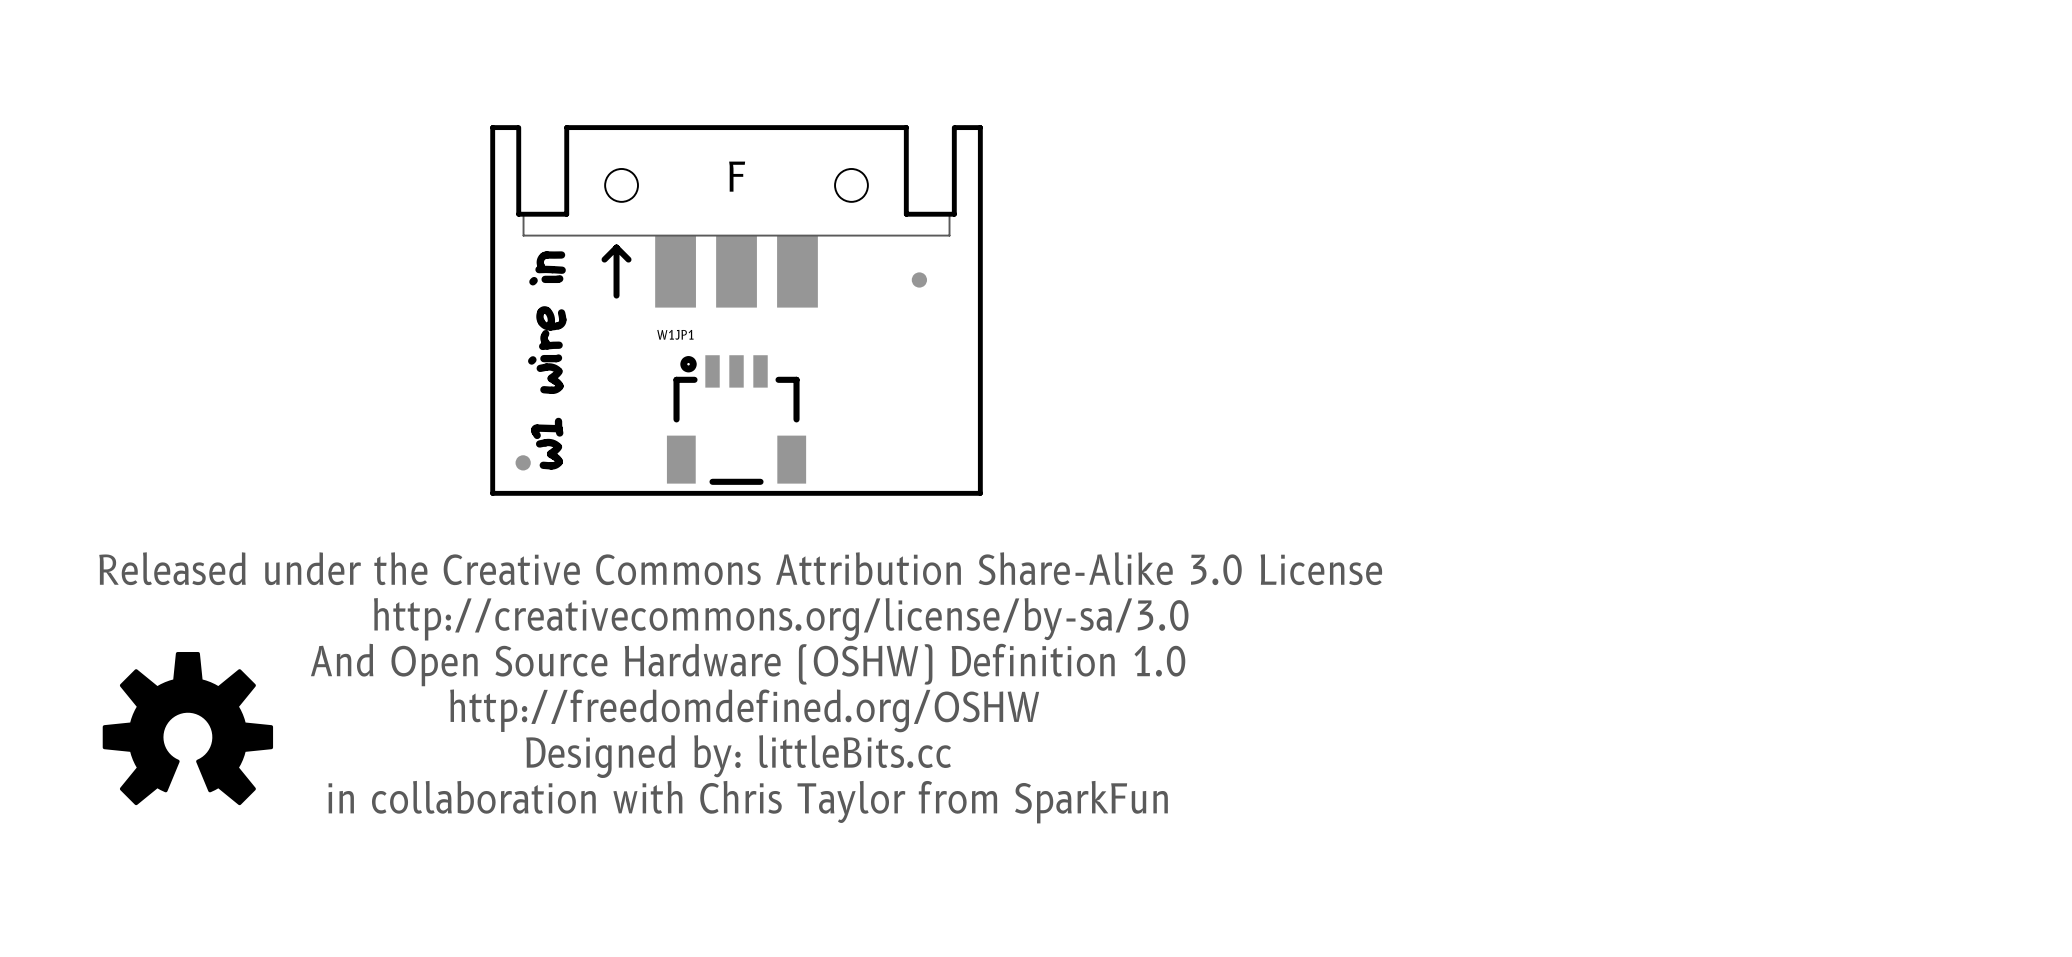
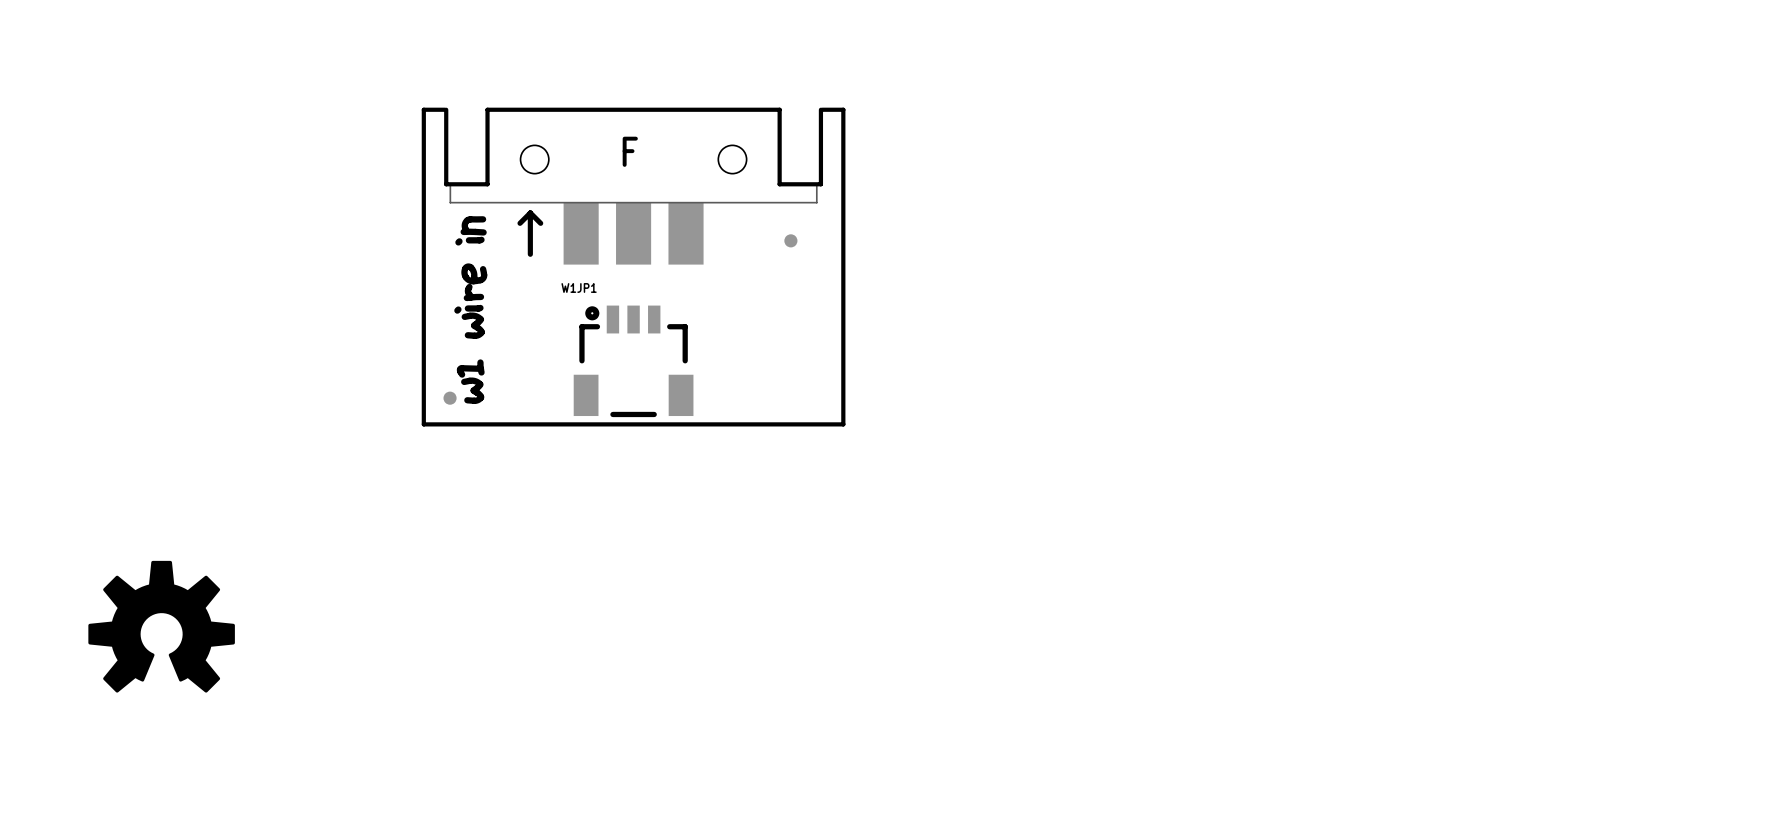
drawing: [99, 552, 1383, 824] -> none

